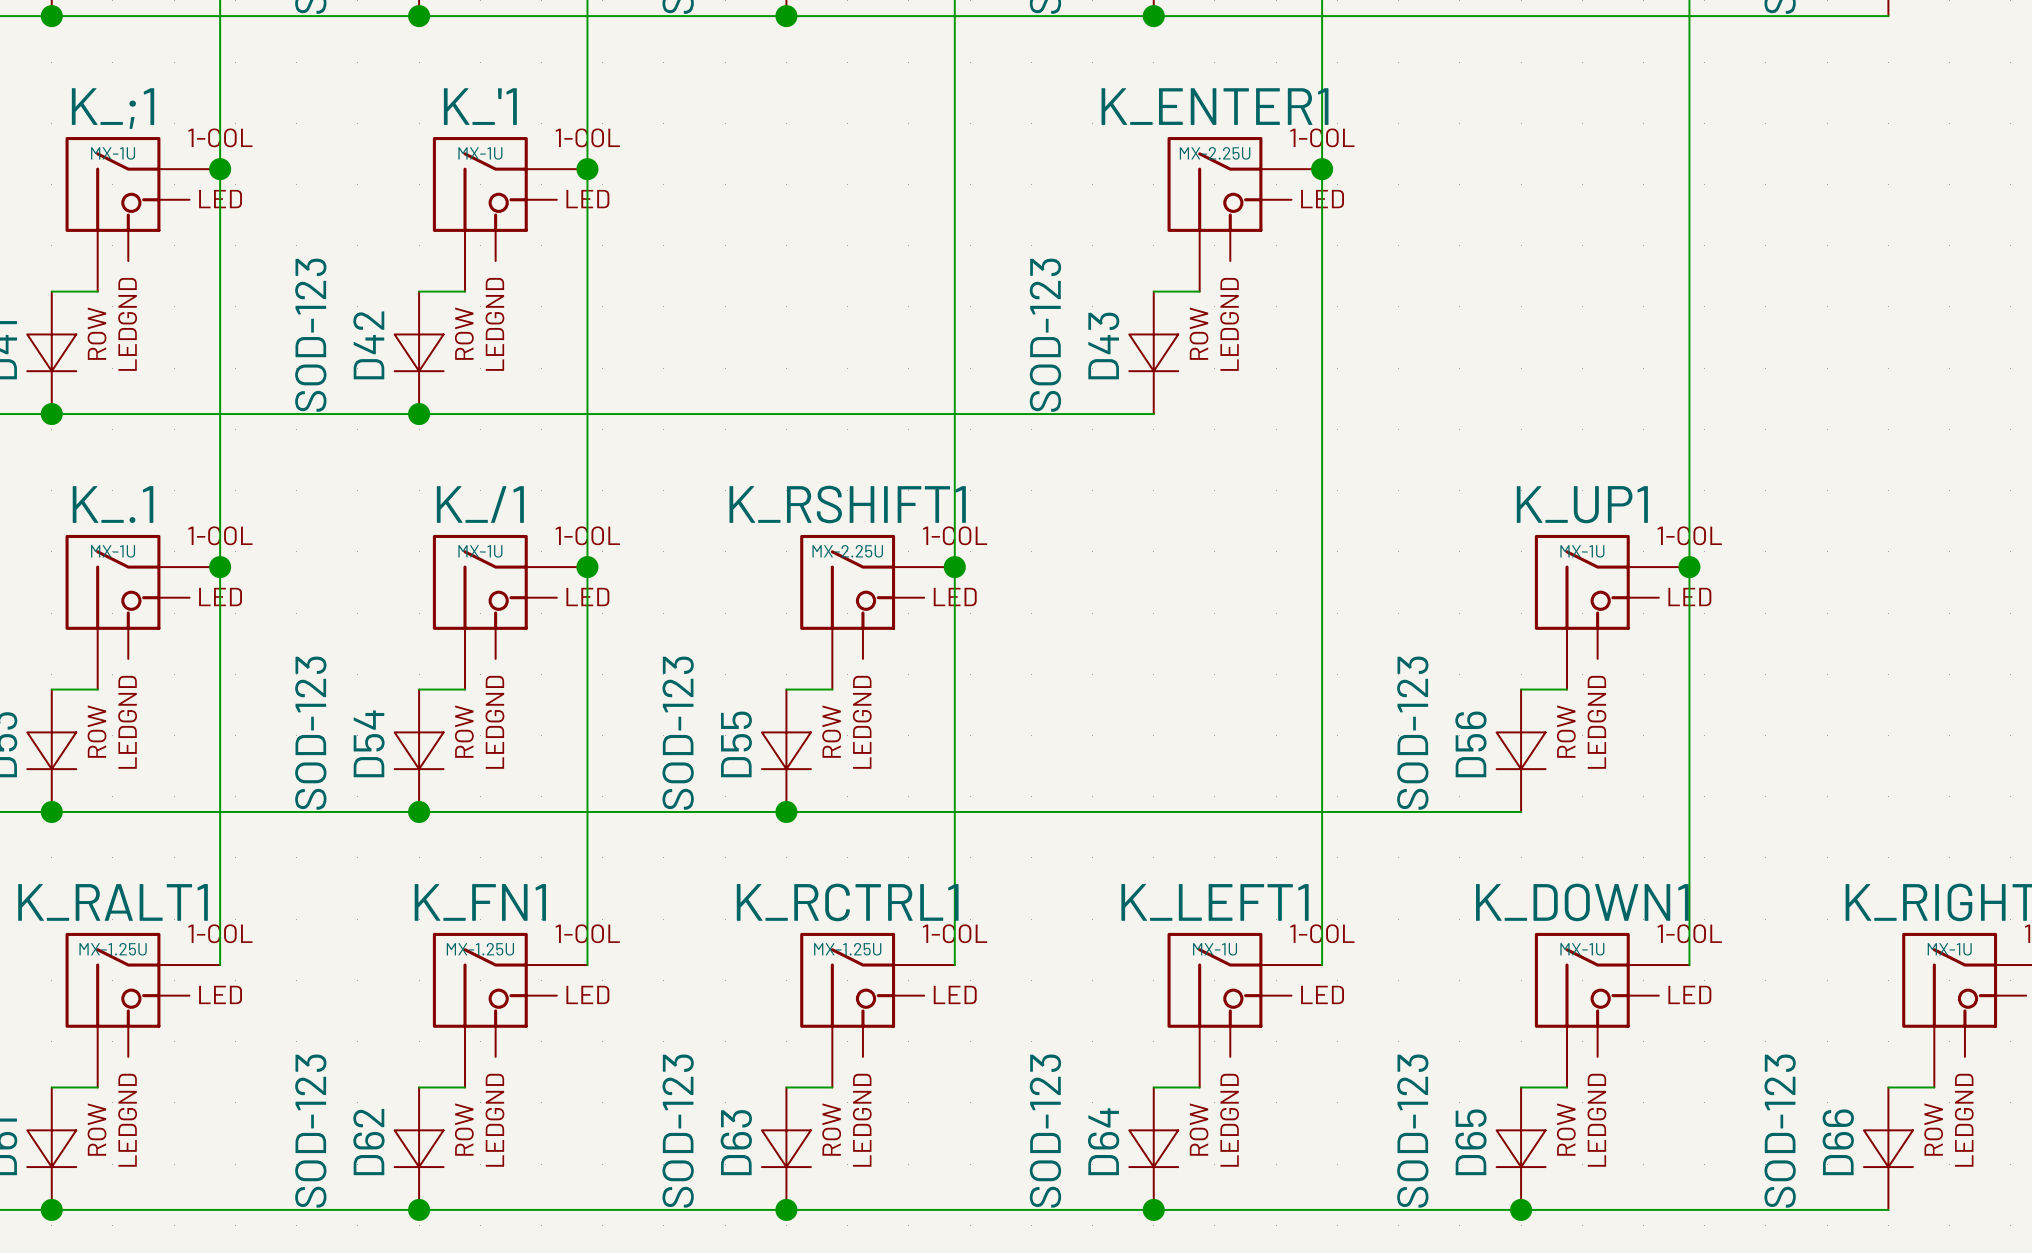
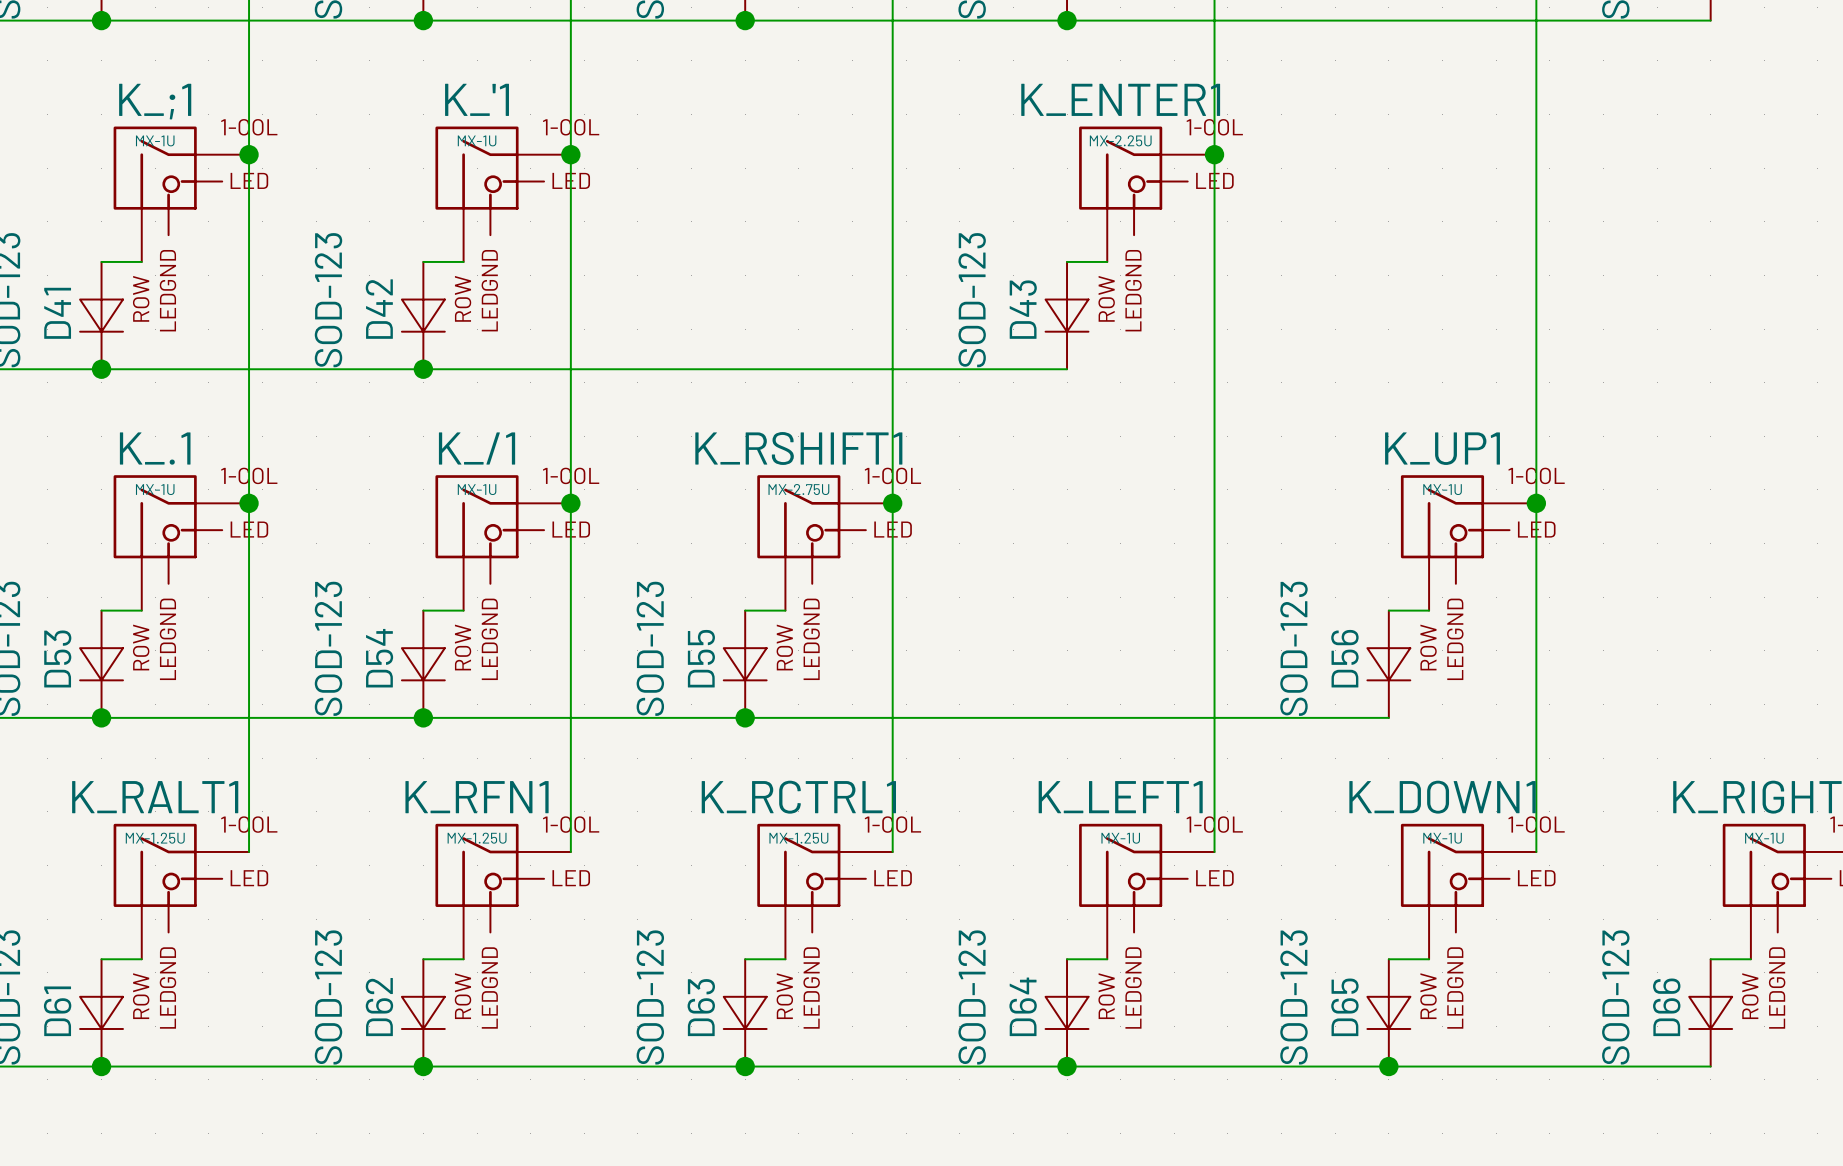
K_RSHIFT1 value: MX-2.25U (847, 551) -> MX-2.75U (798, 489)
K_FN1 name: K_FN1 (480, 902) -> K_RFN1 (477, 797)

